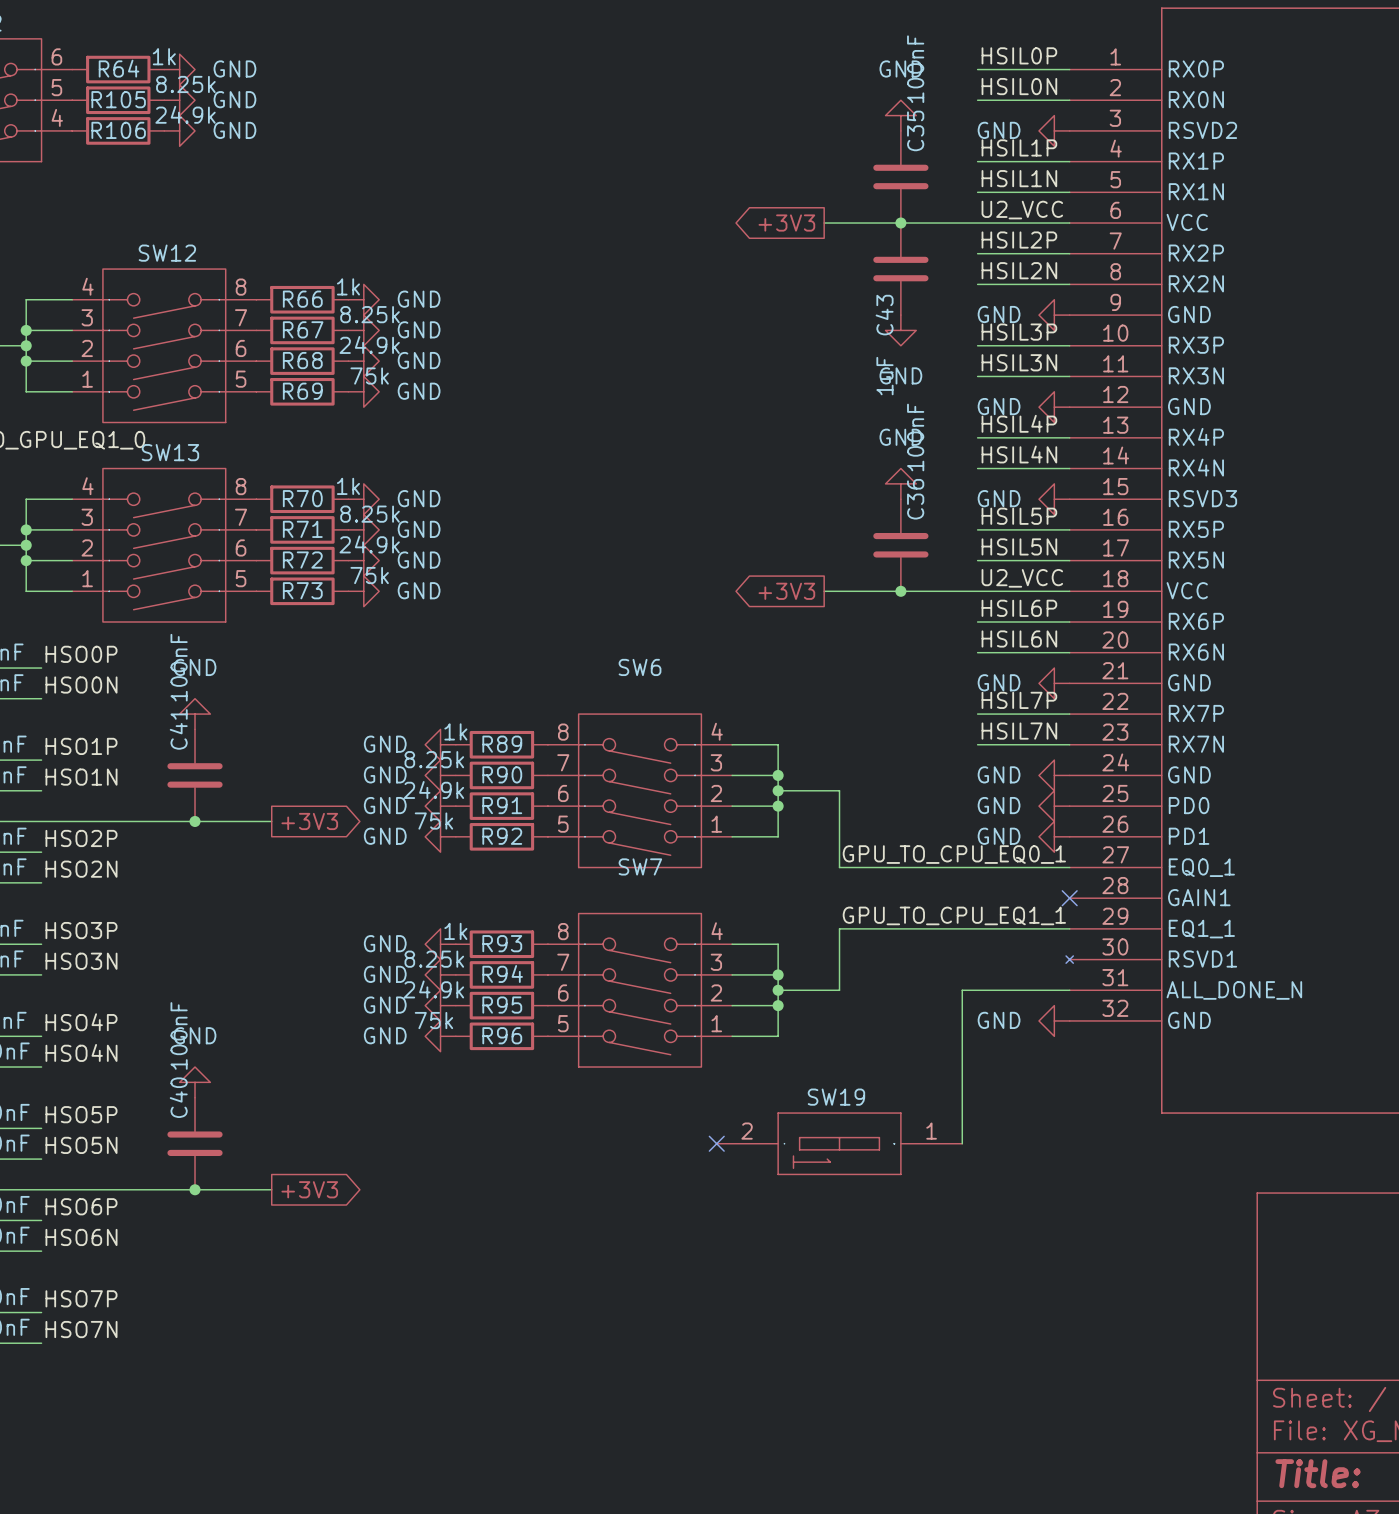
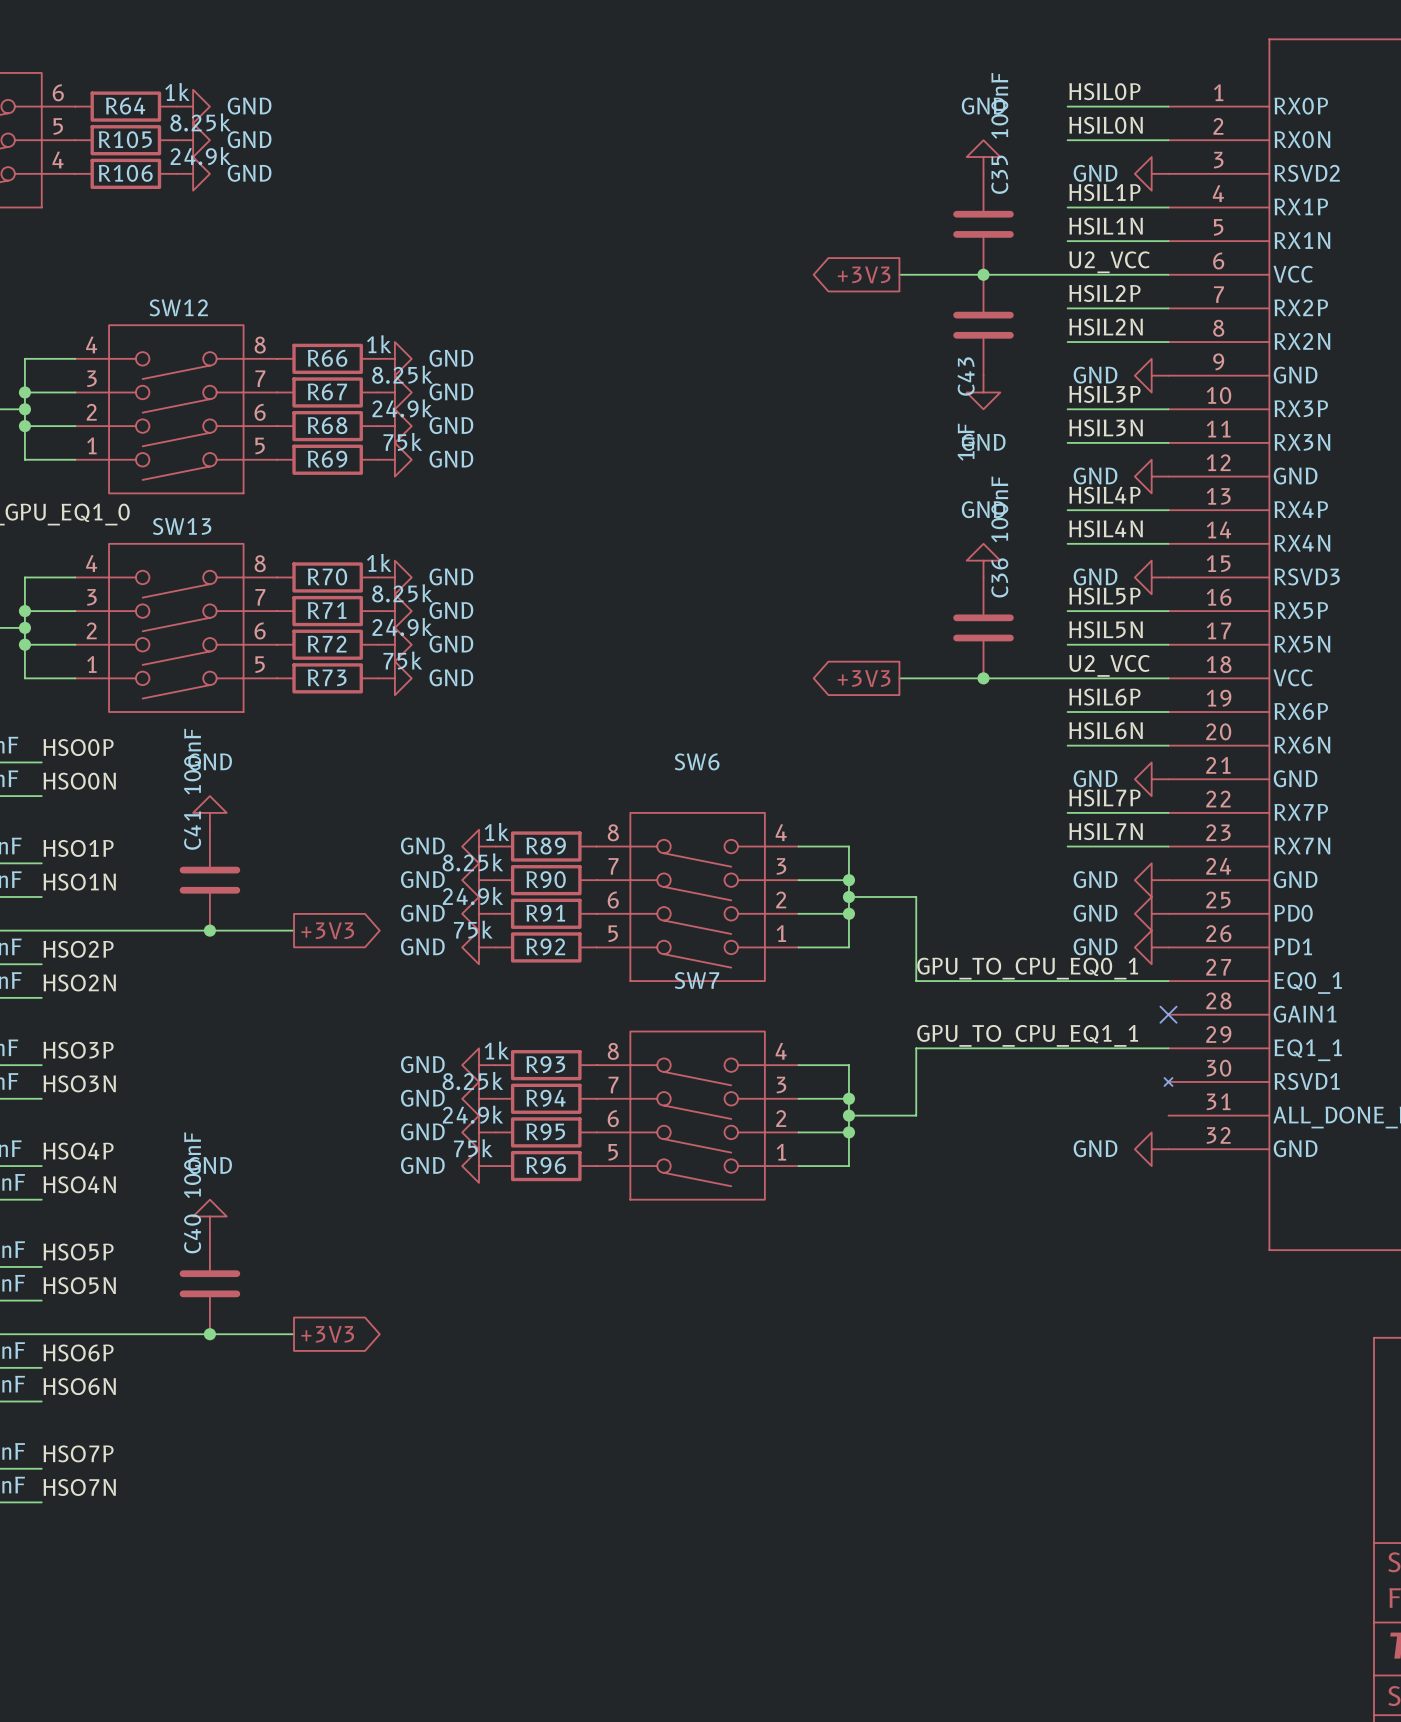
wire: (1069, 990) (962, 990) (962, 1143) -> none
no-connect mark: (716, 1143) -> none
SW19: (839, 1143) -> none

